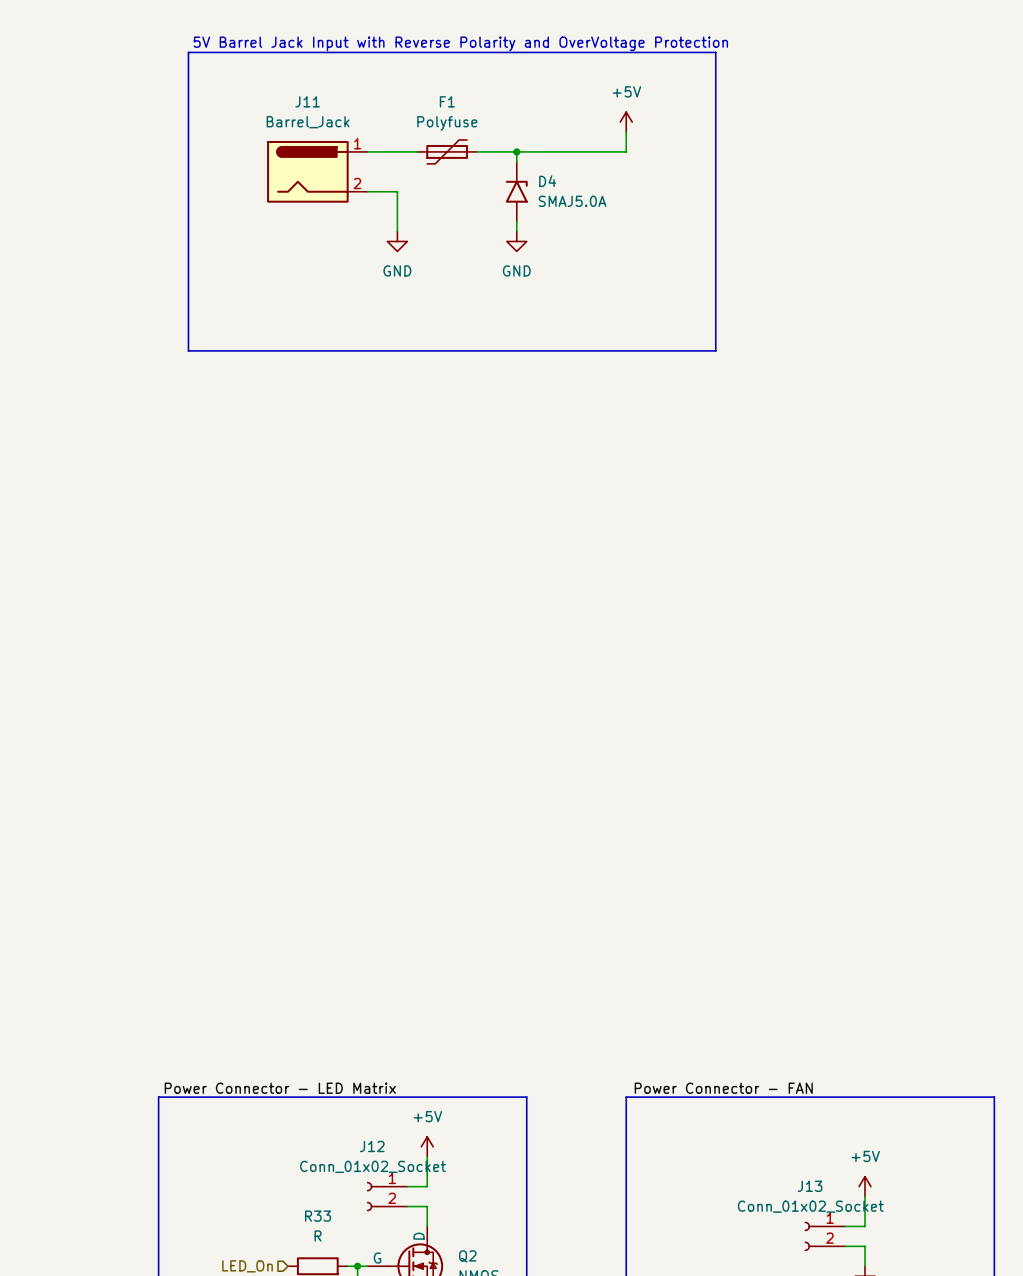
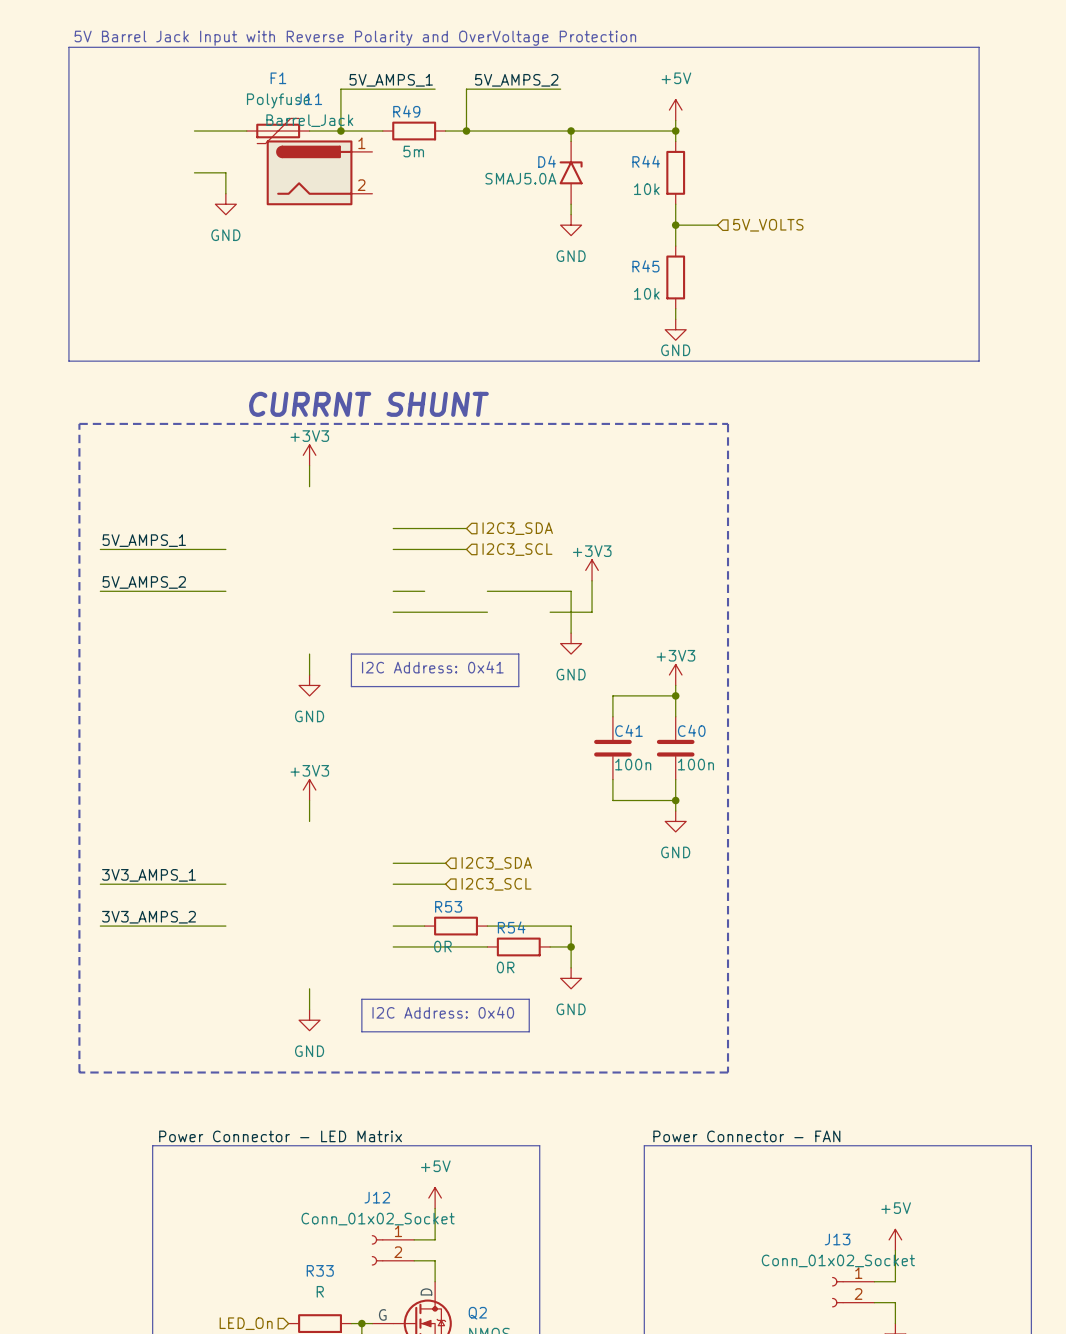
text position: 5V Barrel Jack Input with Reverse Polarity and OverVoltage Protection (460, 43) -> 5V Barrel Jack Input with Reverse Polarity and OverVoltage Protection (355, 38)
line: (188, 52) (188, 350) -> (184, 47) (68, 47) (68, 361) (184, 361)
line: (715, 52) (715, 350) -> (738, 47) (979, 47) (979, 361) (738, 361)
label: none -> 5V_AMPS_1 (391, 80)
label: none -> 5V_AMPS_2 (516, 80)
wire: none -> (435, 89) (340, 89) (340, 131)
wire: none -> (560, 89) (466, 89) (466, 131)
power symbol position: +5V (626, 122) -> +5V (675, 110)
wire: none -> (675, 120) (675, 141)
wire: none -> (309, 131) (382, 131)
junction: none -> (340, 131)
R49: none -> 5m (414, 131)
wire: none -> (445, 131) (675, 131)
junction: none -> (466, 131)
junction: none -> (571, 131)
wire: (626, 132) (626, 151) (476, 151) -> none
junction: none -> (675, 131)
wire: (367, 151) (417, 151) -> (194, 131) (246, 131)
F1 position: (447, 151) -> (278, 131)
wire: (516, 151) (516, 161) -> (571, 131) (571, 141)
junction: (516, 151) -> none
wire: none -> (194, 172) (225, 172) (225, 193)
R44: none -> 10k (675, 172)
D4 name position: D4 (547, 181) -> D4 (547, 161)
wire: (367, 191) (397, 191) (397, 231) -> none
D4 position: (516, 191) -> (571, 172)
power symbol: none -> GND (225, 204)
D4 value position: SMAJ5.0A (572, 201) -> SMAJ5.0A (520, 178)
wire: none -> (675, 204) (675, 246)
wire: (516, 221) (516, 231) -> (571, 204) (571, 214)
wire: none -> (675, 225) (717, 225)
junction: none -> (675, 225)
hierarchical label: none -> 5V_VOLTS (768, 225)
power symbol: GND (397, 241) -> none
power symbol position: GND (516, 241) -> GND (571, 225)
R45: none -> 10k (675, 277)
wire: none -> (675, 308) (675, 319)
power symbol: none -> GND (675, 329)
text: none -> CURRNT SHUNT (368, 404)
line: none -> (79, 423) (728, 423) (728, 1072) (79, 1072) (79, 423)
power symbol: none -> +3V3 (309, 455)
wire: none -> (309, 465) (309, 486)
wire: none -> (393, 528) (466, 528)
hierarchical label: none -> I2C3_SDA (517, 528)
label: none -> 5V_AMPS_1 (144, 540)
wire: none -> (100, 549) (225, 549)
wire: none -> (393, 549) (466, 549)
hierarchical label: none -> I2C3_SCL (517, 549)
power symbol: none -> +3V3 (592, 570)
wire: none -> (592, 580) (592, 612) (550, 612)
label: none -> 5V_AMPS_2 (144, 582)
wire: none -> (100, 591) (225, 591)
wire: none -> (393, 591) (424, 591)
wire: none -> (487, 591) (571, 591) (571, 633)
wire: none -> (393, 612) (487, 612)
power symbol: none -> GND (571, 643)
wire: none -> (309, 654) (309, 674)
line: none -> (351, 654) (518, 654) (518, 686) (351, 686) (351, 654)
text: none -> I2C Address: 0x41 (432, 667)
power symbol: none -> +3V3 (675, 674)
power symbol: none -> GND (309, 685)
wire: none -> (675, 685) (675, 716)
wire: none -> (675, 695) (612, 695) (612, 716)
junction: none -> (675, 695)
C41: none -> 100n (612, 748)
C40: none -> 100n (675, 748)
wire: none -> (612, 779) (612, 800) (675, 800)
wire: none -> (675, 779) (675, 810)
power symbol: none -> +3V3 (309, 790)
wire: none -> (309, 800) (309, 821)
junction: none -> (675, 800)
power symbol: none -> GND (675, 821)
wire: none -> (393, 863) (445, 863)
hierarchical label: none -> I2C3_SDA (496, 863)
label: none -> 3V3_AMPS_1 (148, 875)
wire: none -> (100, 884) (225, 884)
wire: none -> (393, 884) (445, 884)
hierarchical label: none -> I2C3_SCL (496, 884)
label: none -> 3V3_AMPS_2 (148, 917)
wire: none -> (100, 926) (225, 926)
wire: none -> (393, 926) (424, 926)
R53: none -> 0R (456, 926)
wire: none -> (487, 926) (571, 926) (571, 967)
wire: none -> (393, 946) (487, 946)
R54: none -> 0R (518, 946)
wire: none -> (550, 946) (571, 946)
junction: none -> (571, 946)
power symbol: none -> GND (571, 978)
wire: none -> (309, 988) (309, 1009)
line: none -> (361, 999) (529, 999) (529, 1031) (361, 1031) (361, 999)
text: none -> I2C Address: 0x40 (443, 1012)
power symbol: none -> GND (309, 1020)

